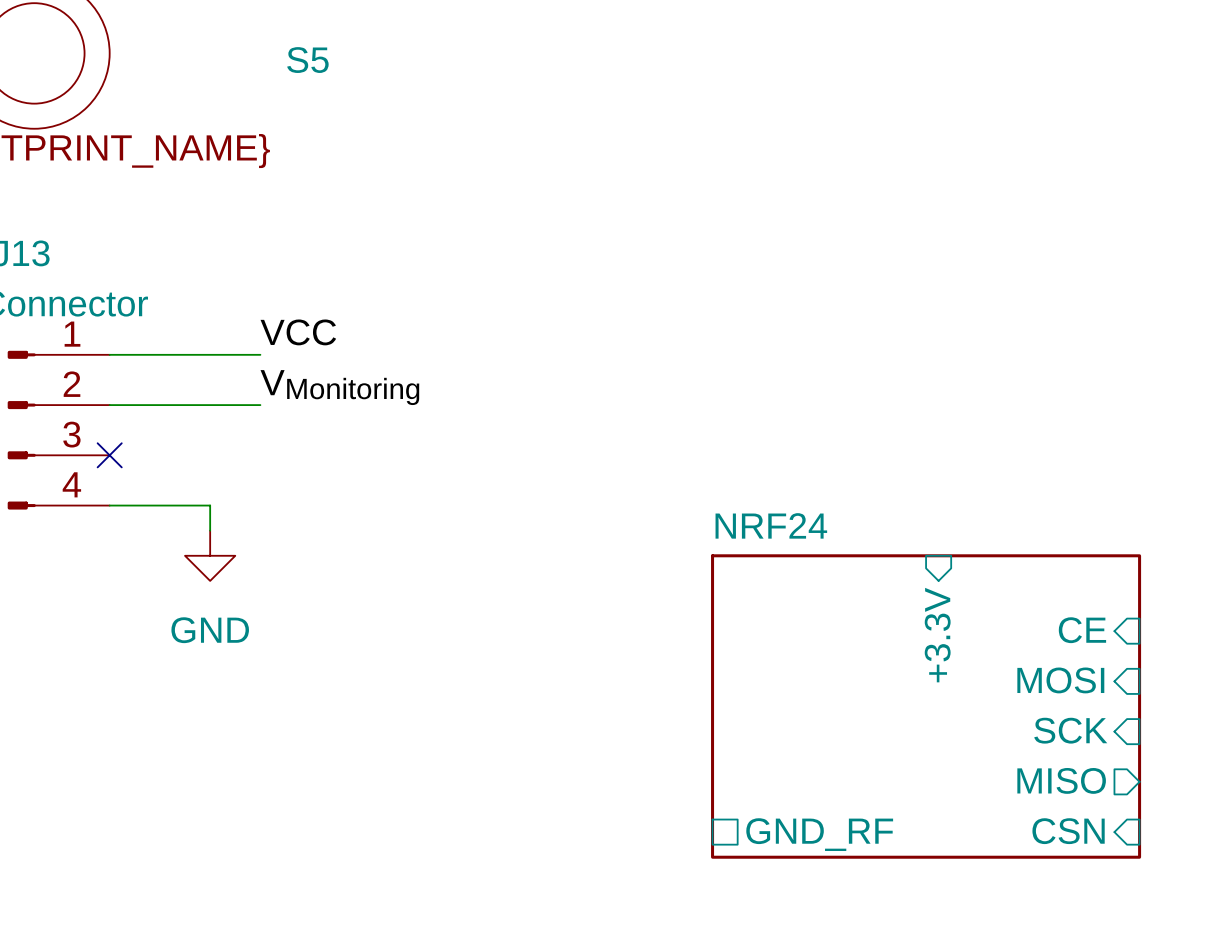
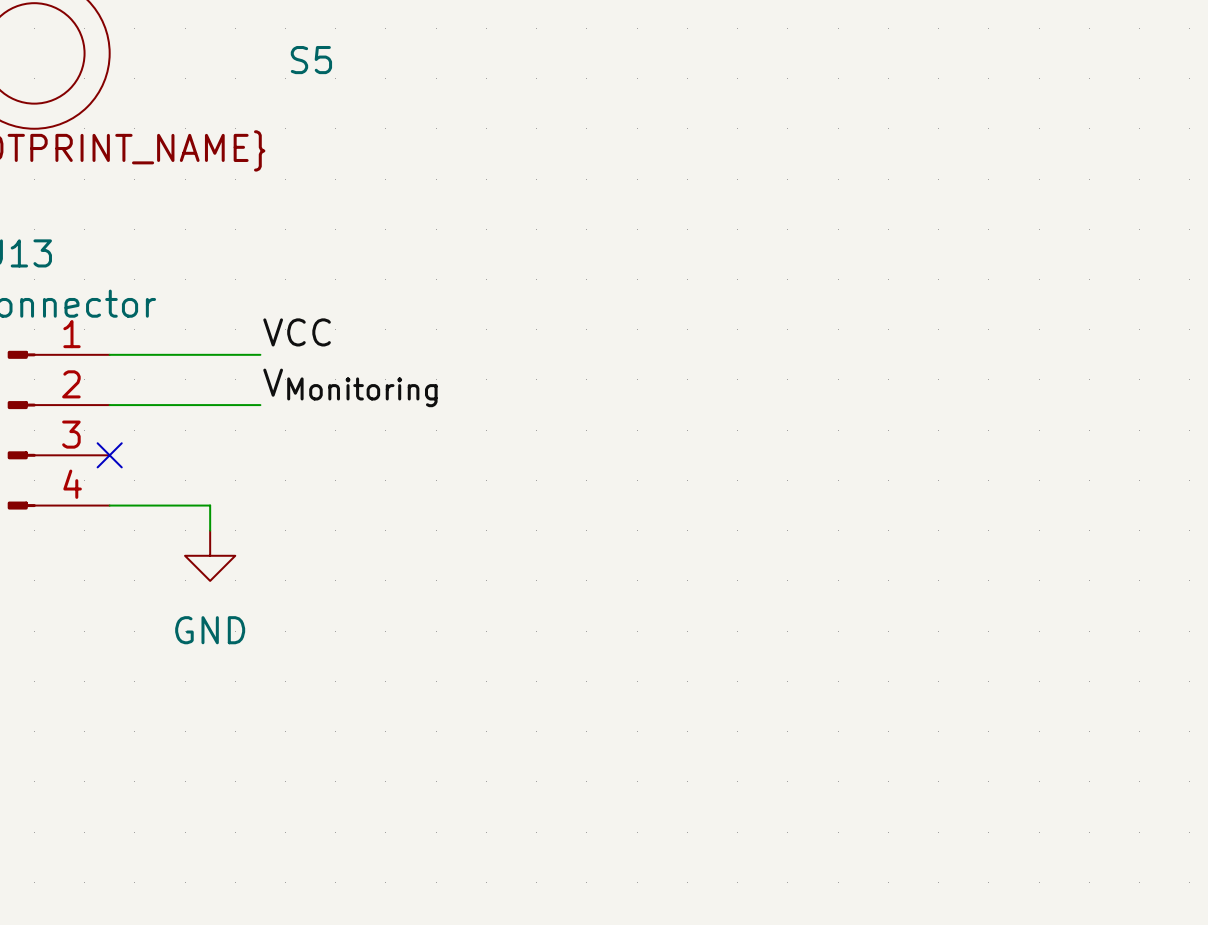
sheet pin: CE (1082, 630) -> none
sheet pin: +3.3V (937, 635) -> none
sheet pin: MOSI (1060, 680) -> none
sheet NRF24: (926, 706) -> none
sheet pin: SCK (1070, 730) -> none
sheet pin: MISO (1061, 780) -> none
sheet pin: CSN (1068, 831) -> none
sheet pin: GND_RF (819, 834) -> none

